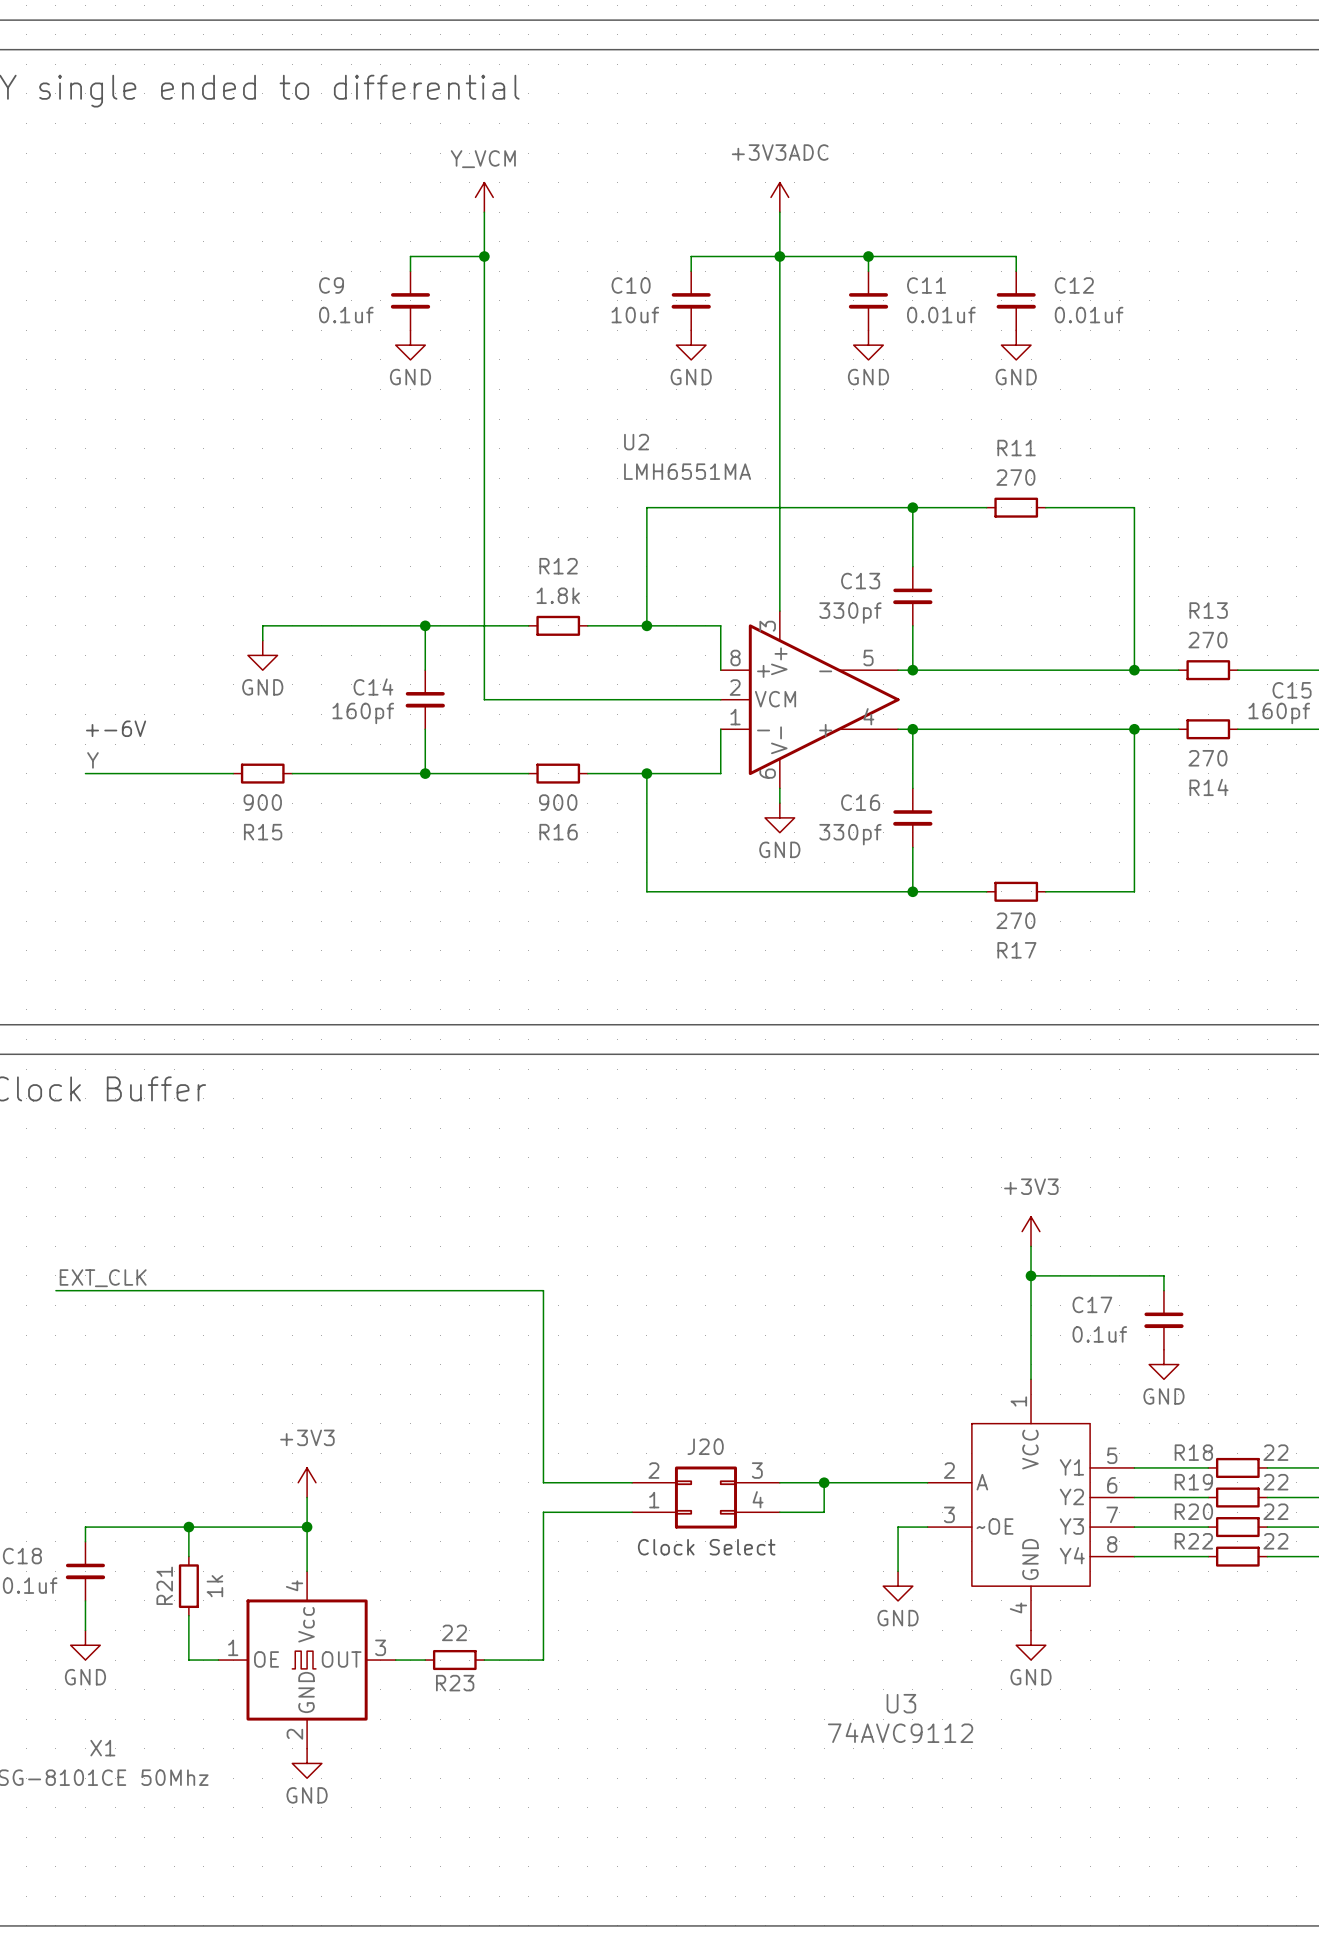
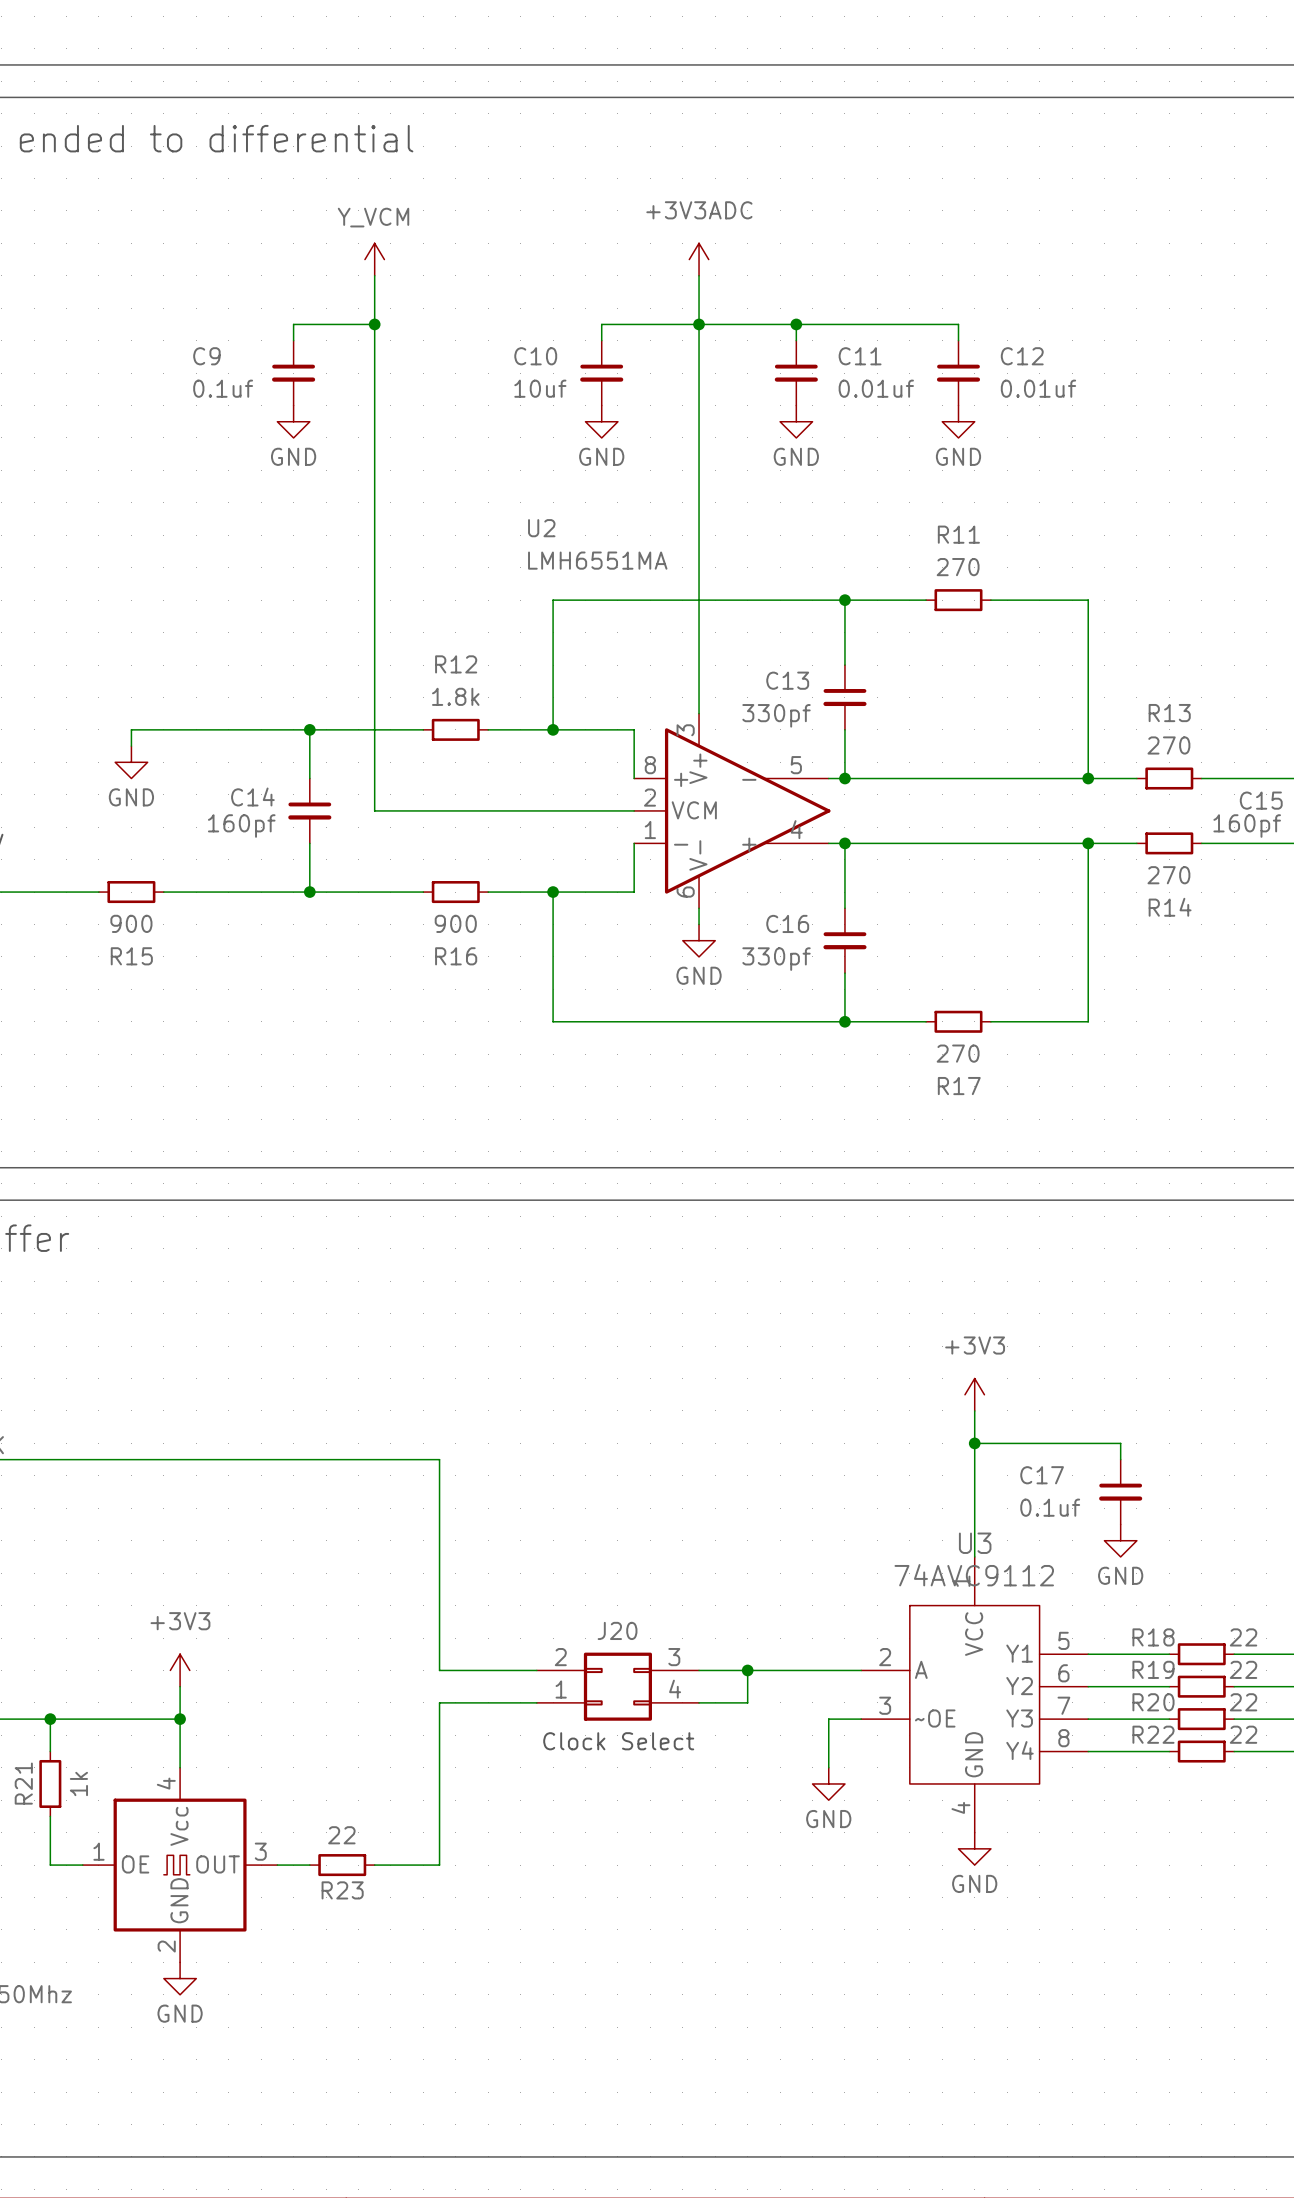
U3 name position: U3 (901, 1703) -> U3 (975, 1543)
U3 value position: 74AVC9112 (900, 1732) -> 74AVC9112 (974, 1575)

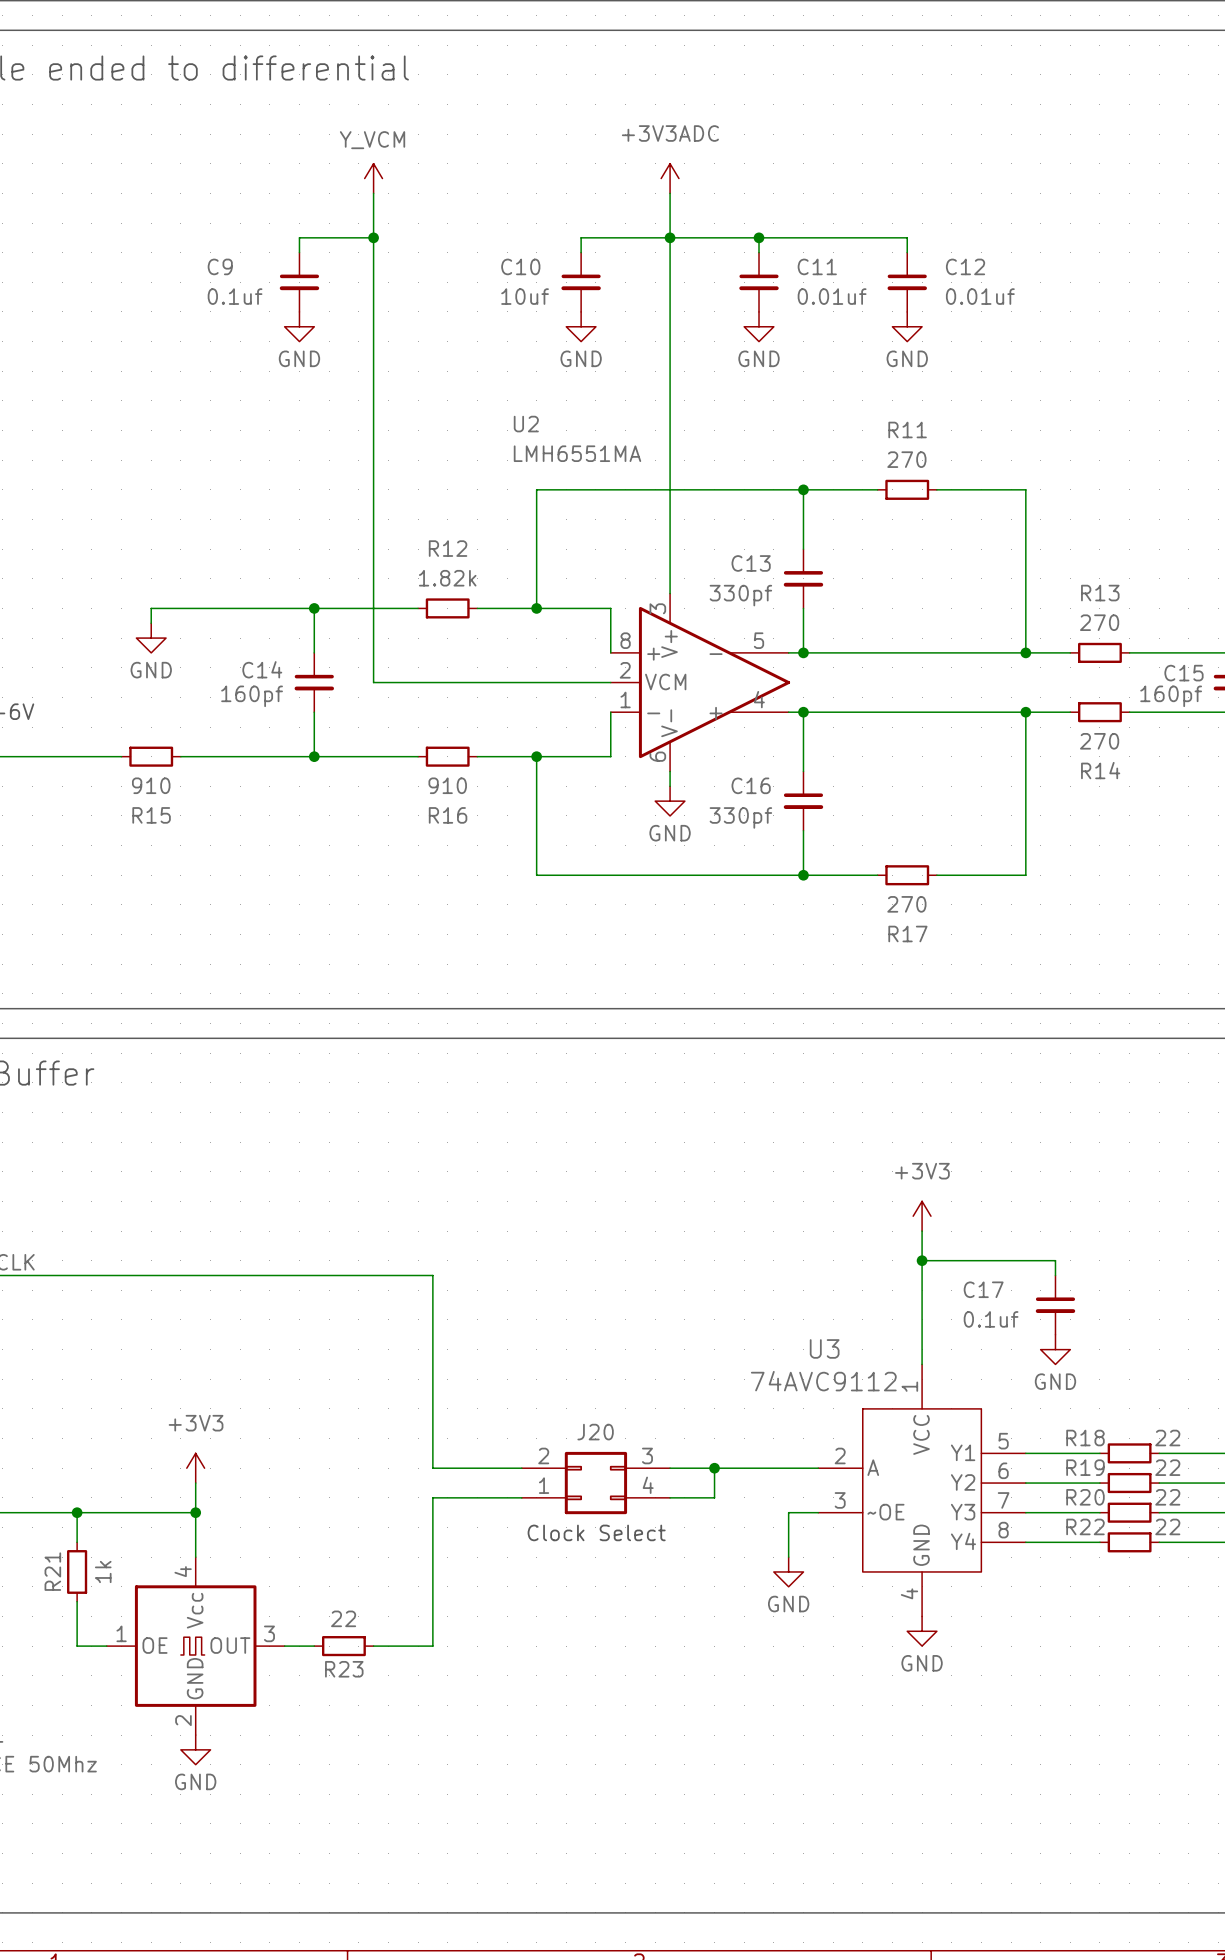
R12 value: 1.8k (455, 696) -> 1.82k (447, 578)
R15 value: 900 (131, 923) -> 910 (151, 785)
R16 value: 900 (455, 923) -> 910 (447, 785)
U3 name position: U3 (975, 1543) -> U3 (824, 1348)
U3 value position: 74AVC9112 (974, 1575) -> 74AVC9112 (823, 1381)

